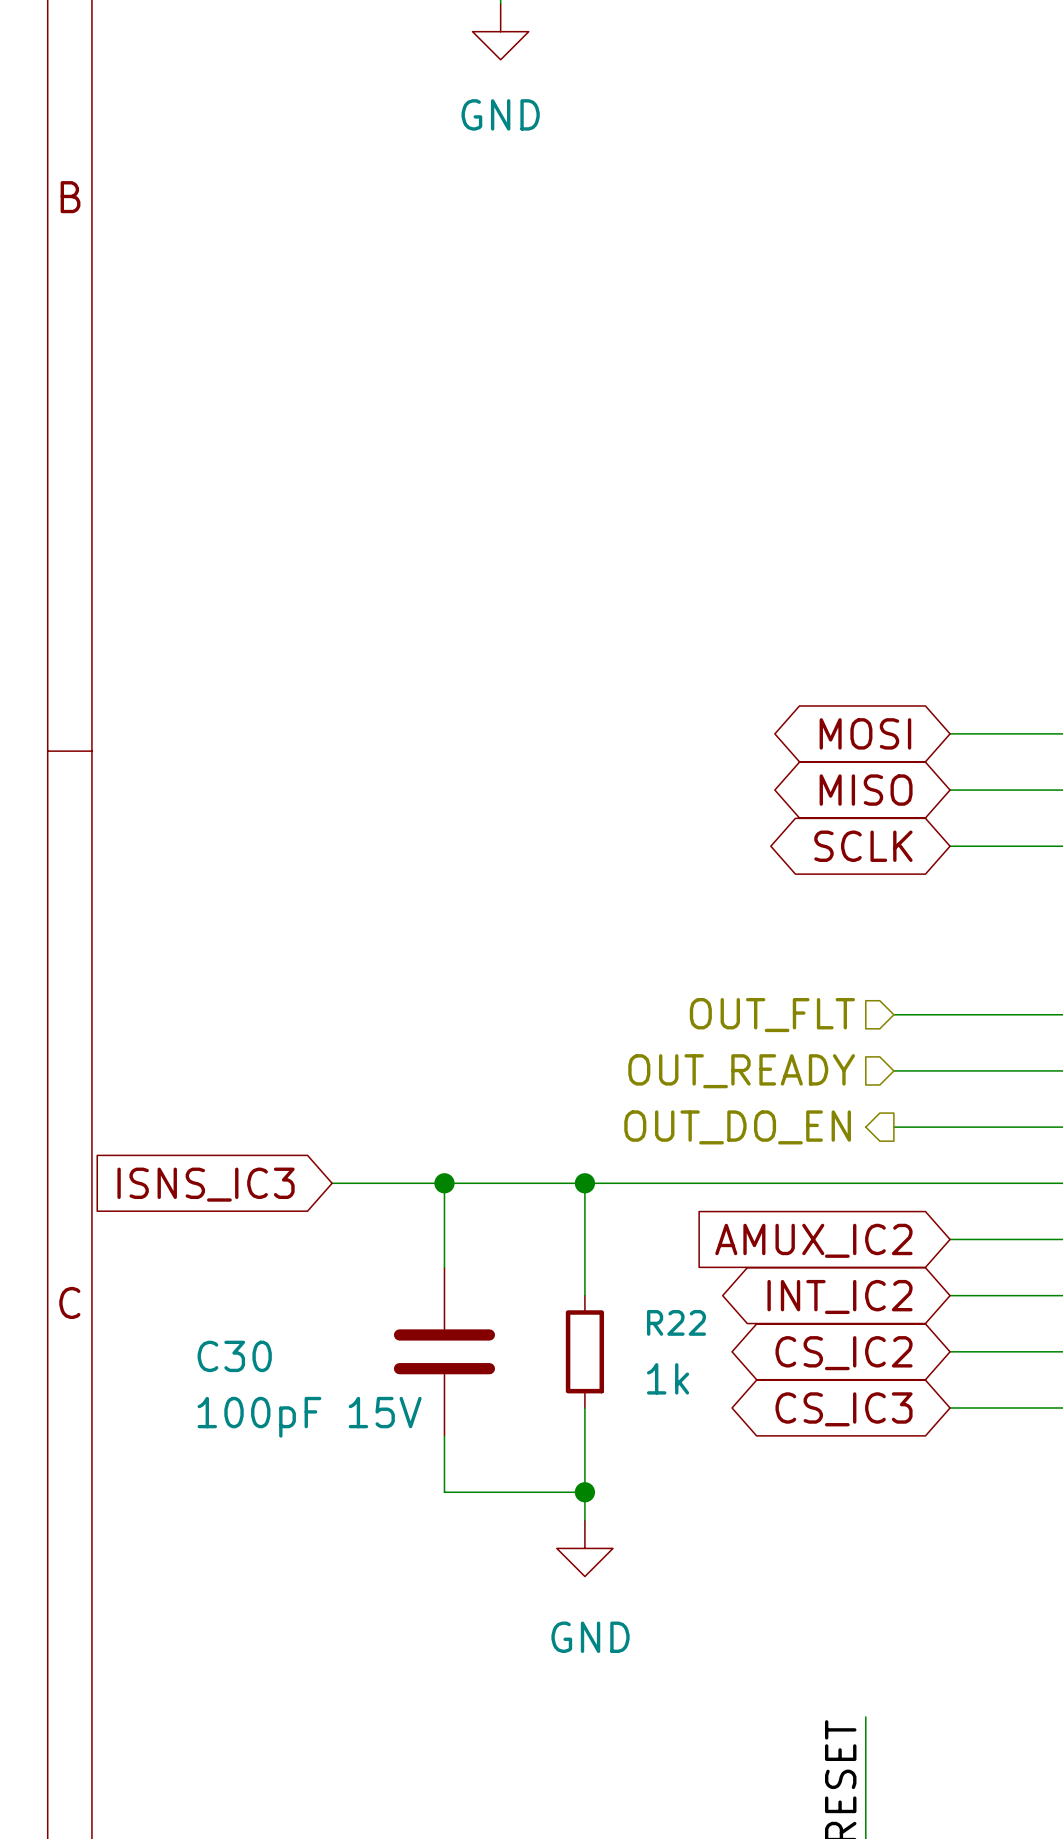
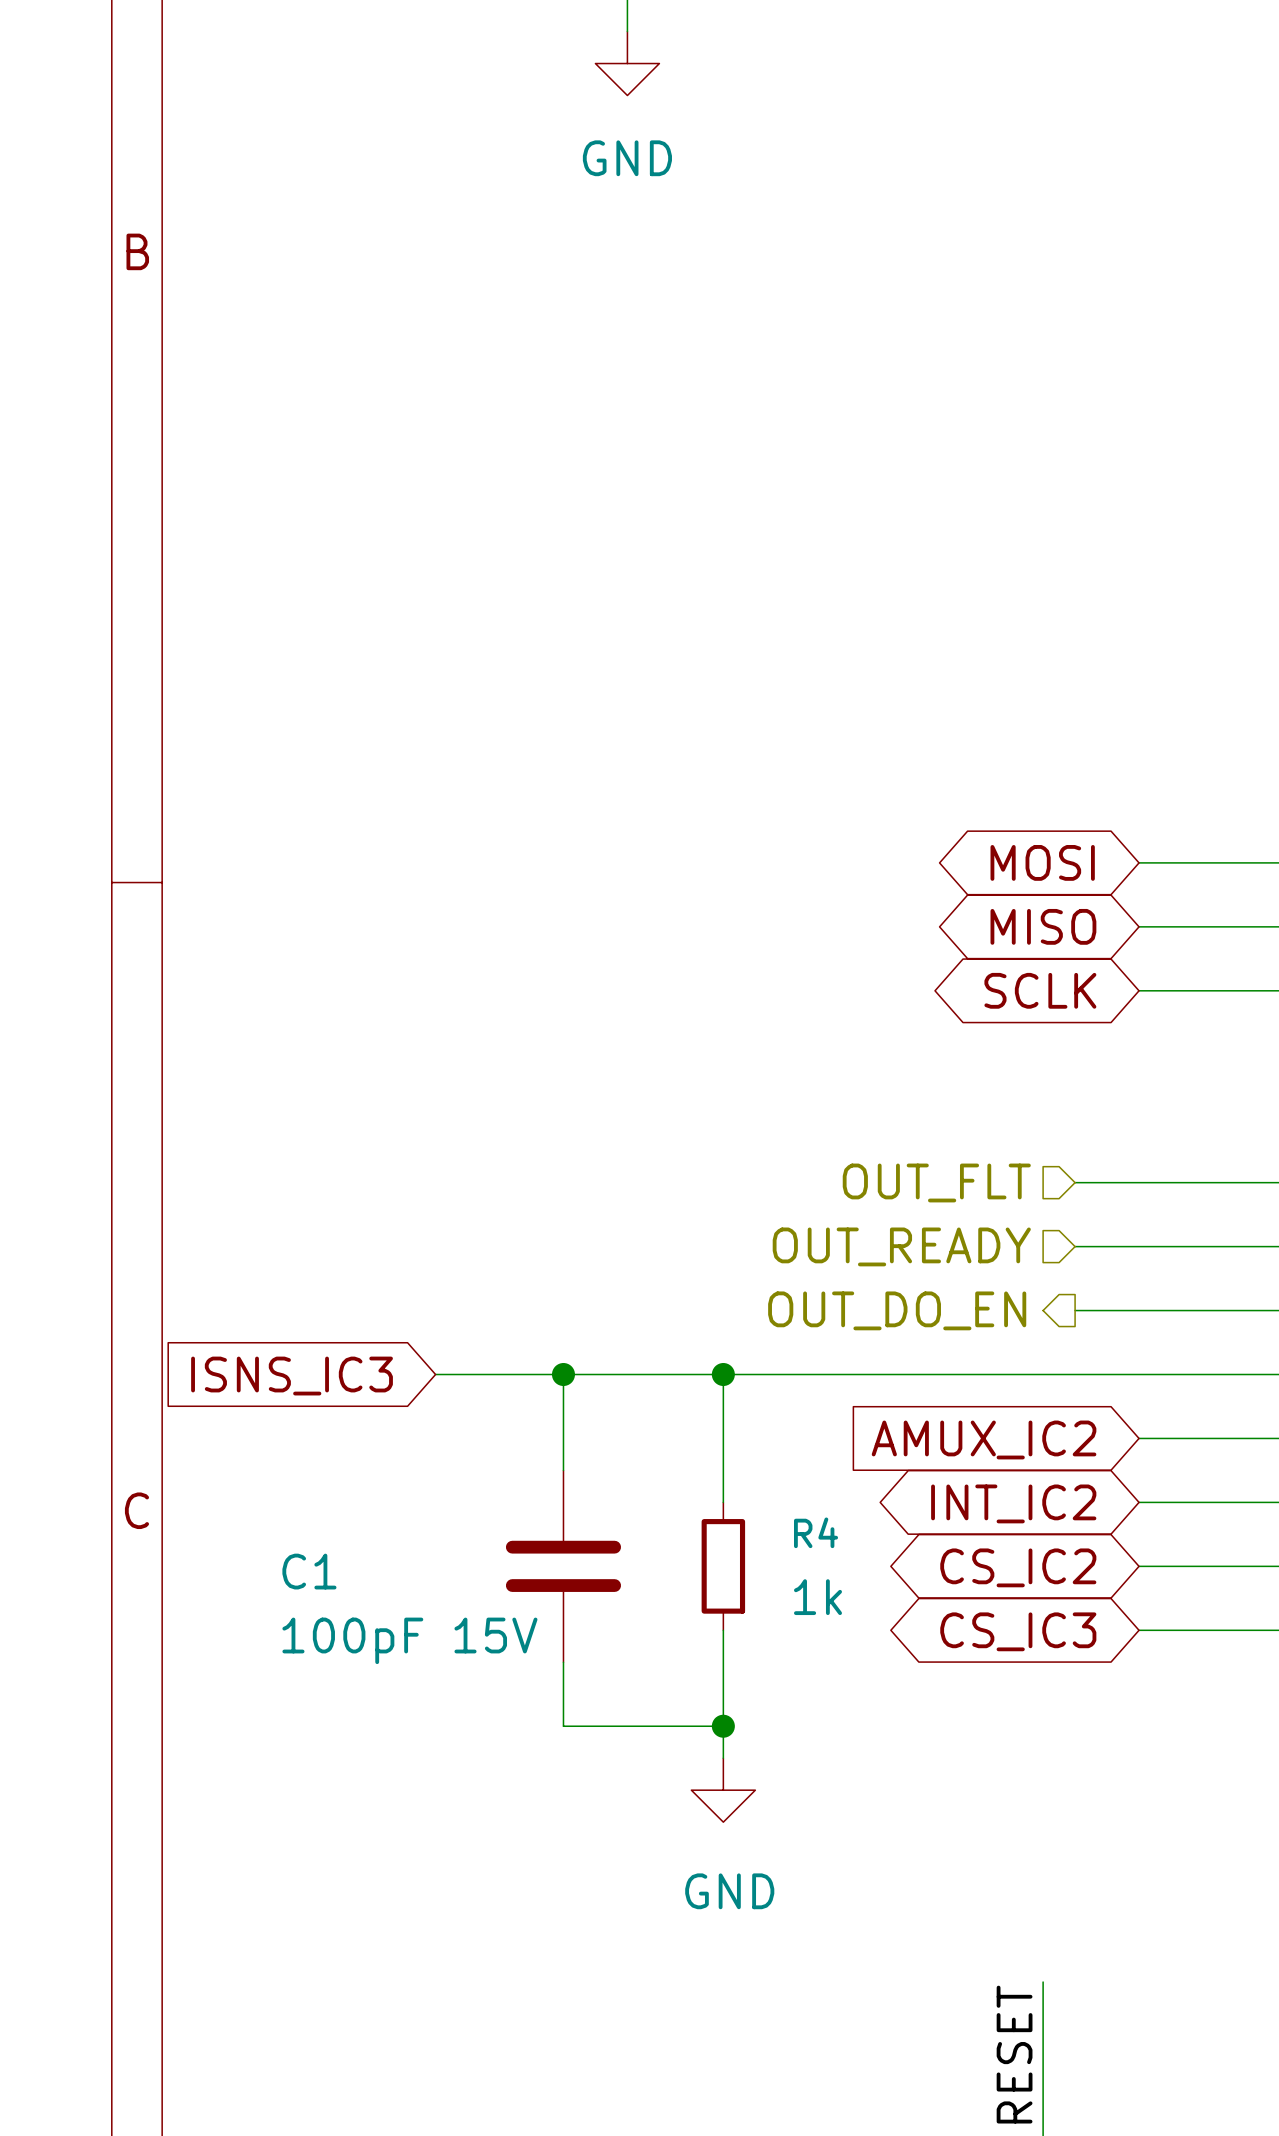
R22 name: R22 (676, 1322) -> R4 (816, 1532)
C30 name: C30 (234, 1356) -> C1 (309, 1571)

